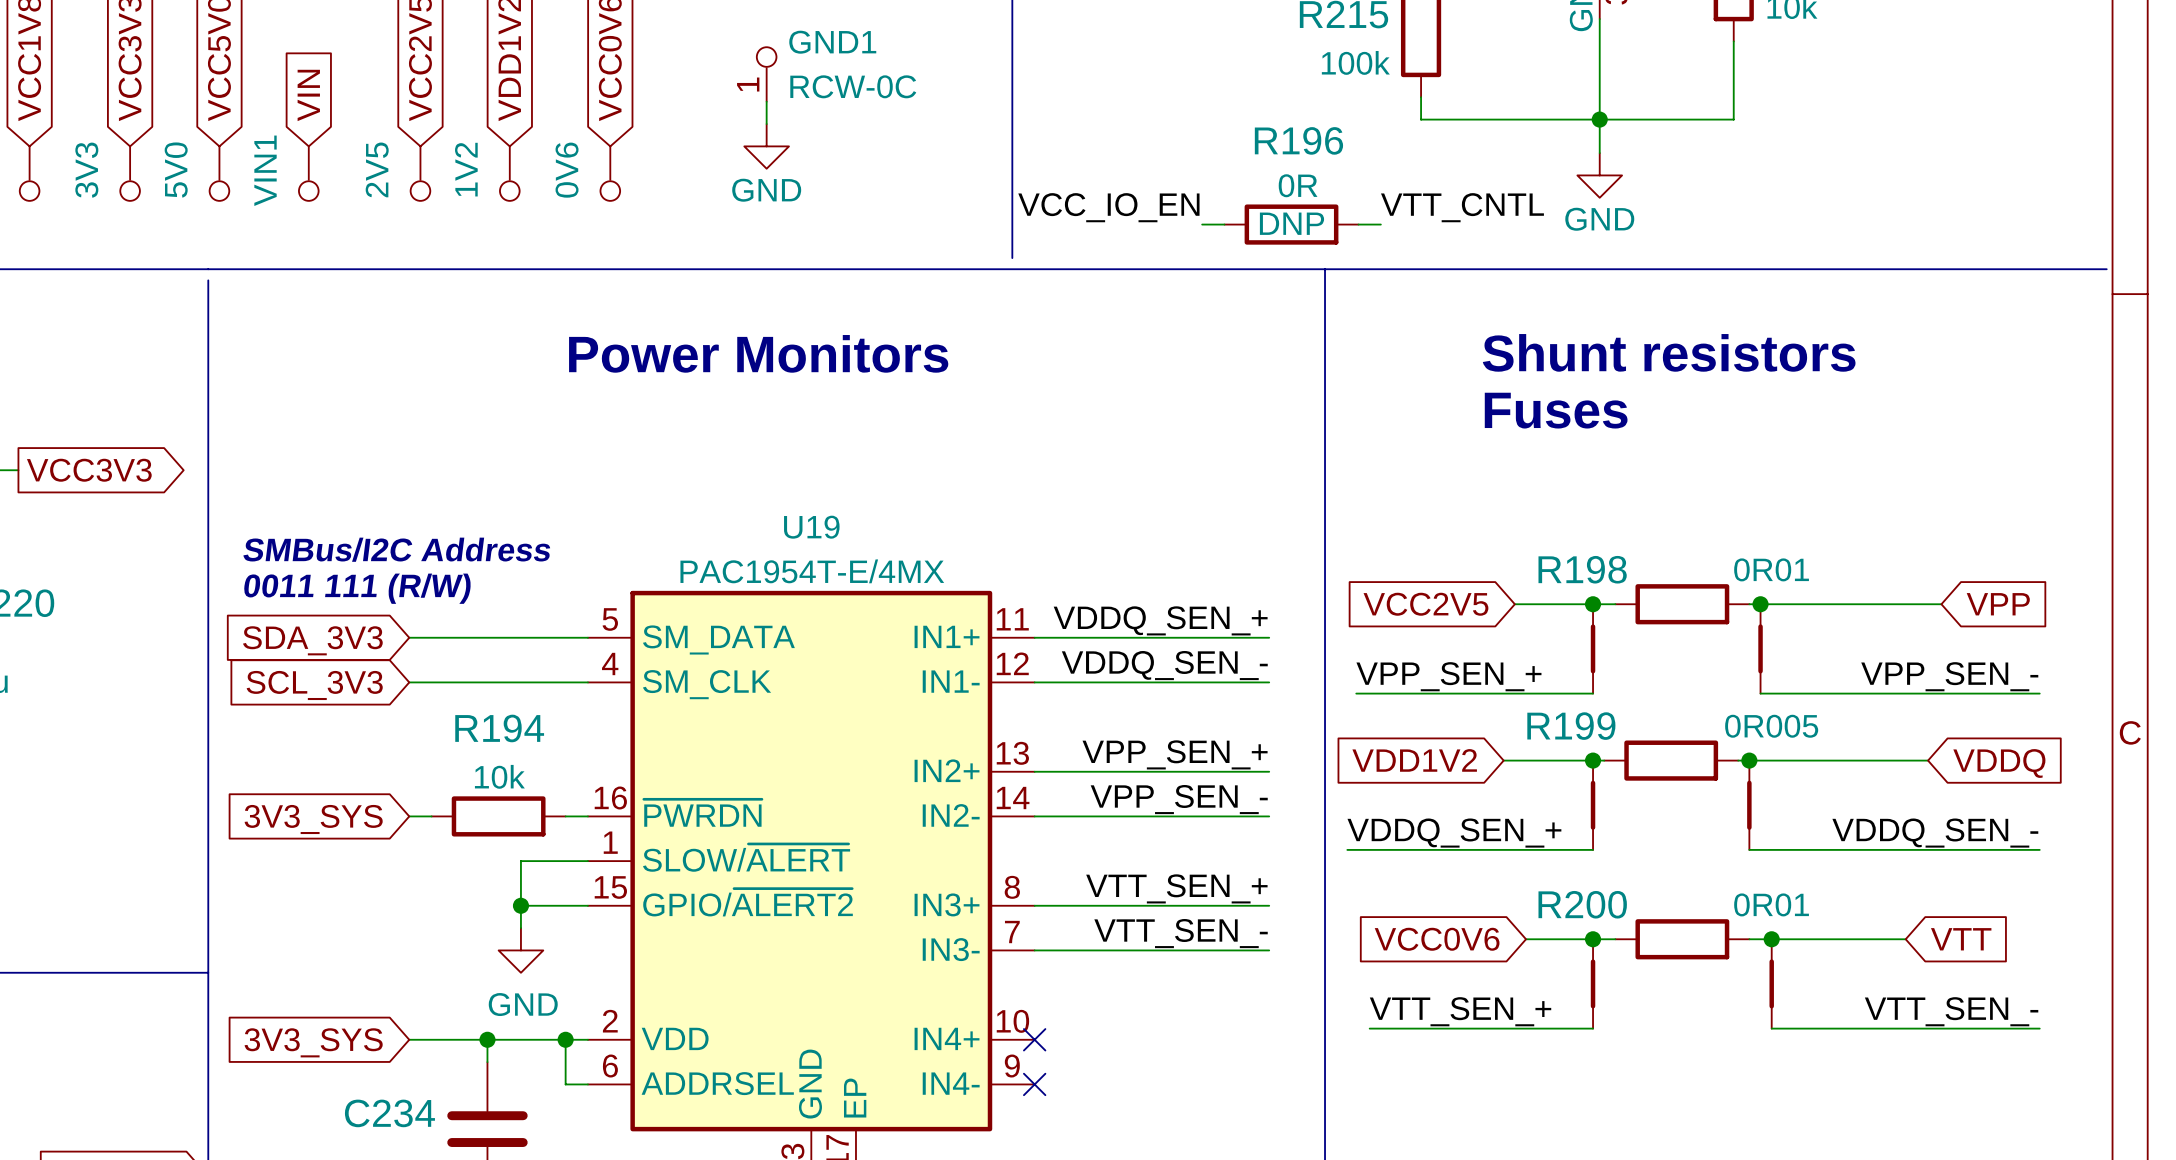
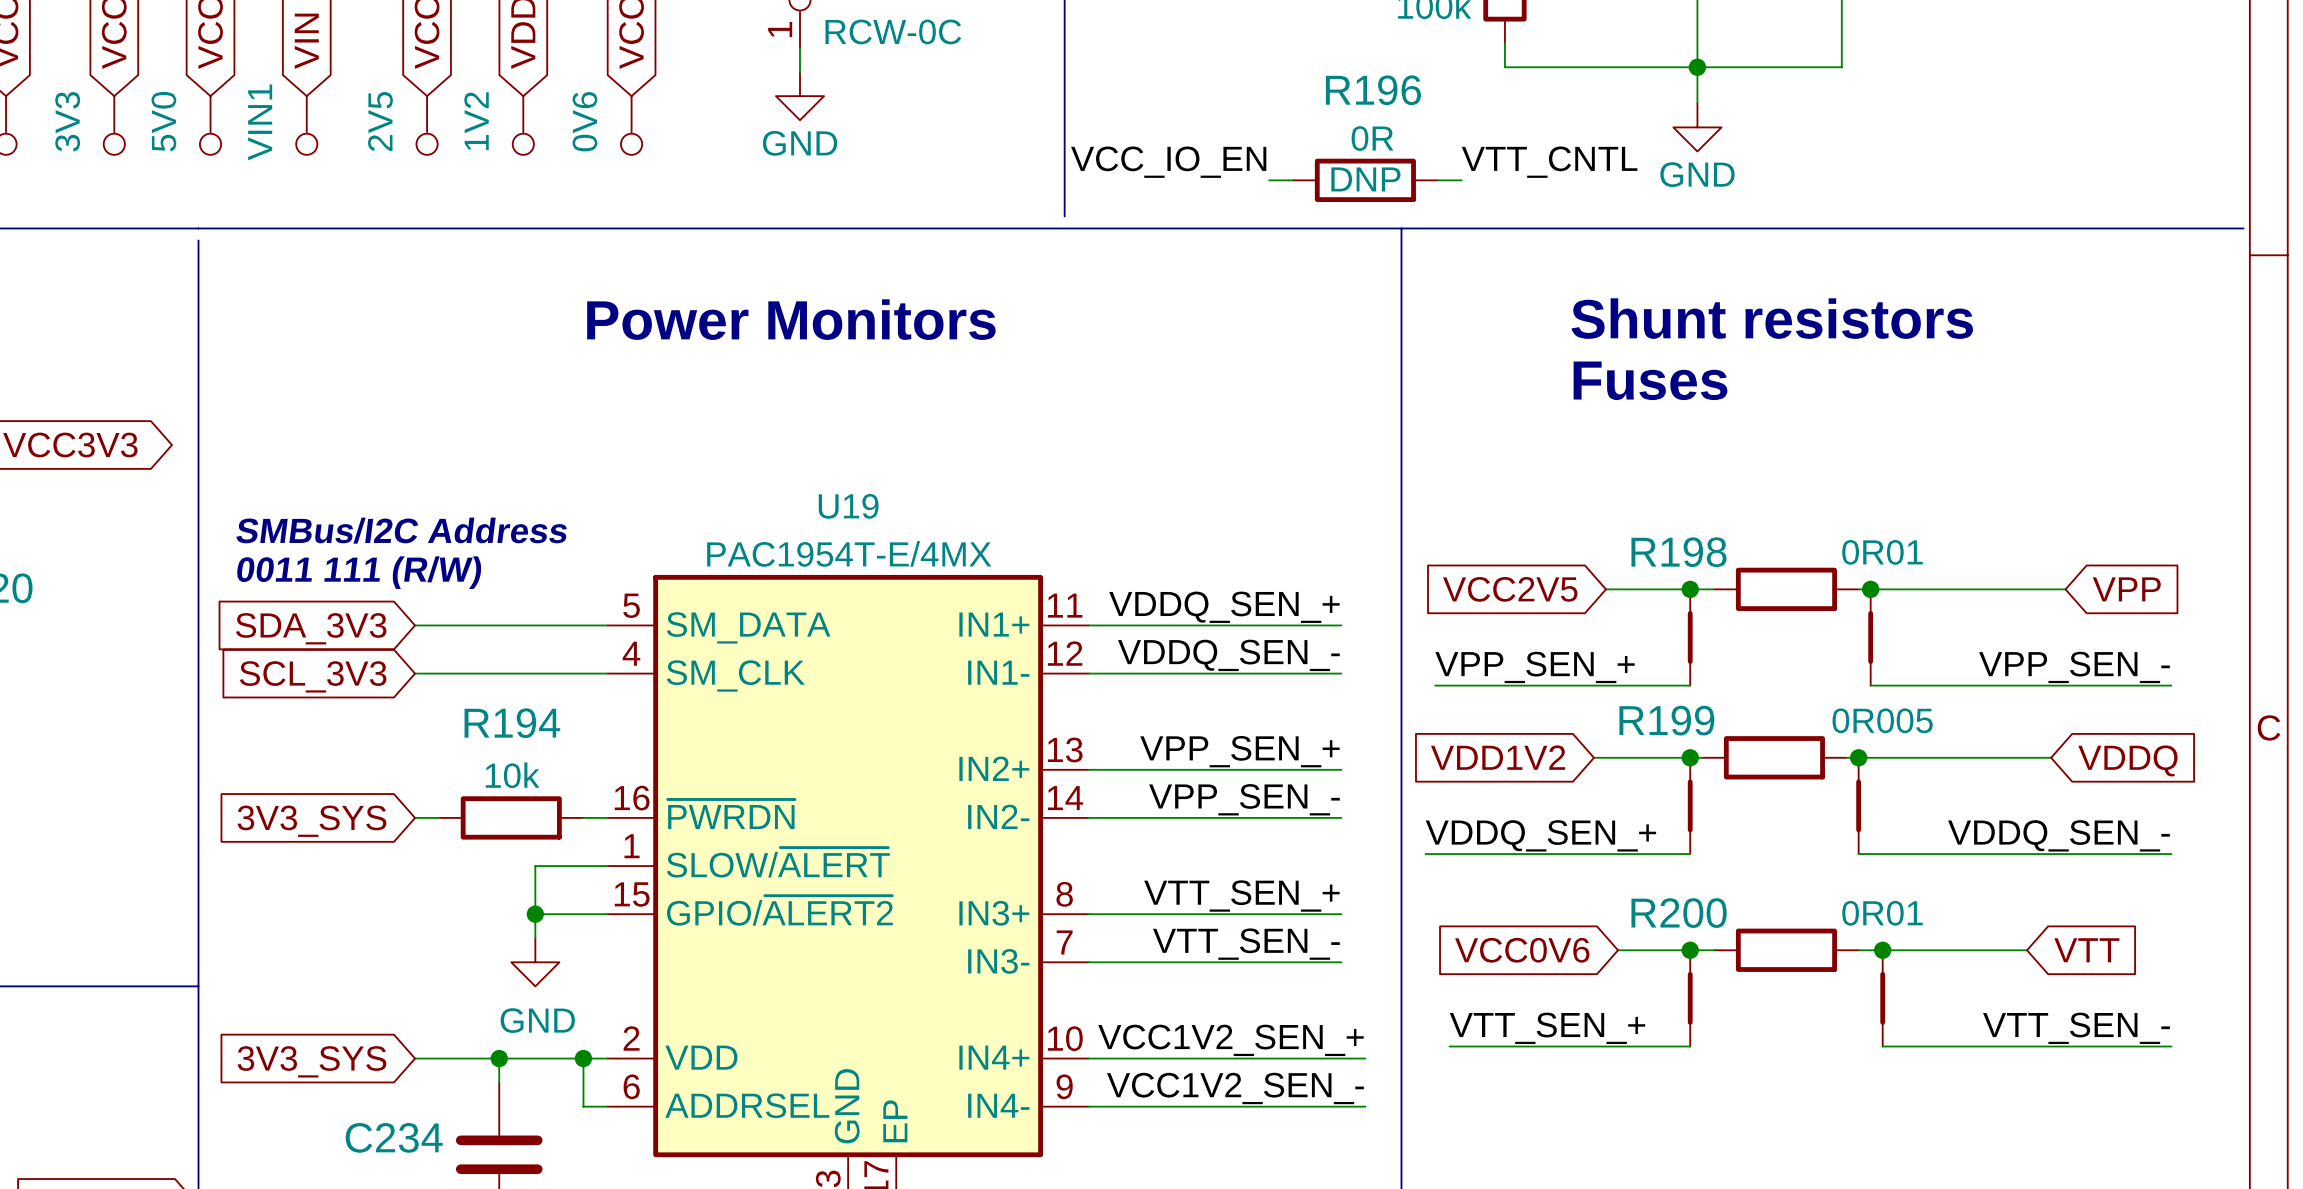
label: none -> VCC1V2_SEN_+ (1230, 1040)
wire: none -> (1088, 1058) (1365, 1058)
no-connect mark: (1034, 1039) -> none
label: none -> VCC1V2_SEN_- (1235, 1088)
wire: none -> (1088, 1106) (1365, 1106)
no-connect mark: (1034, 1084) -> none

